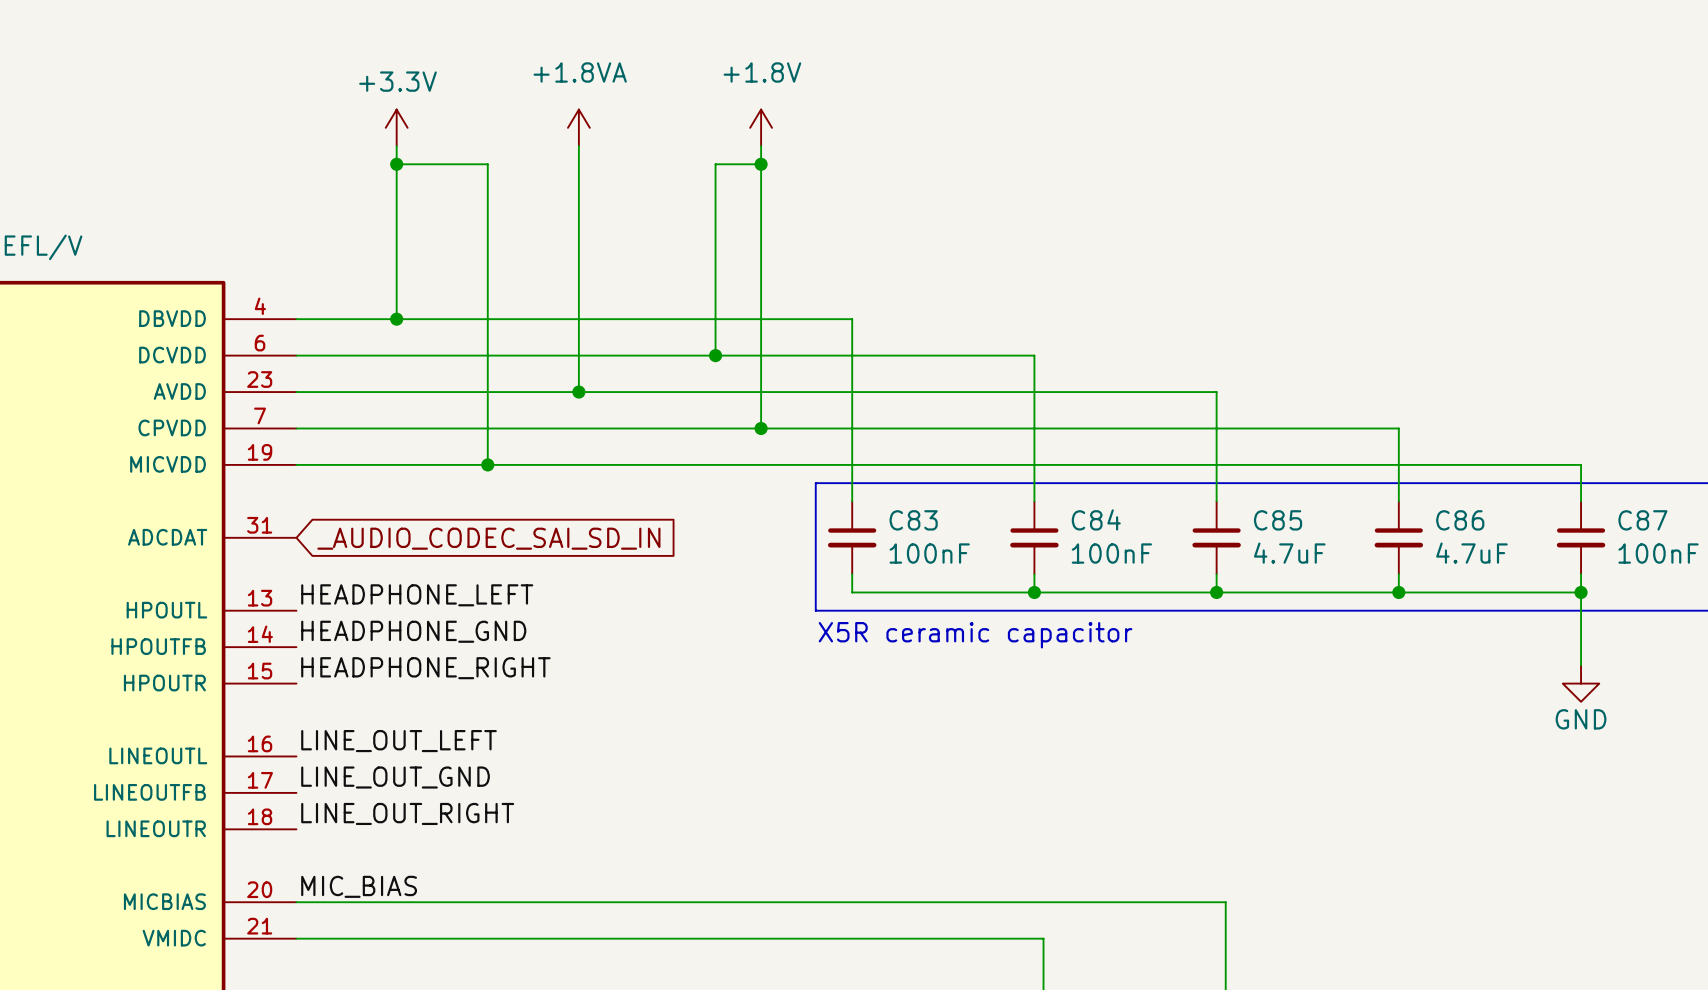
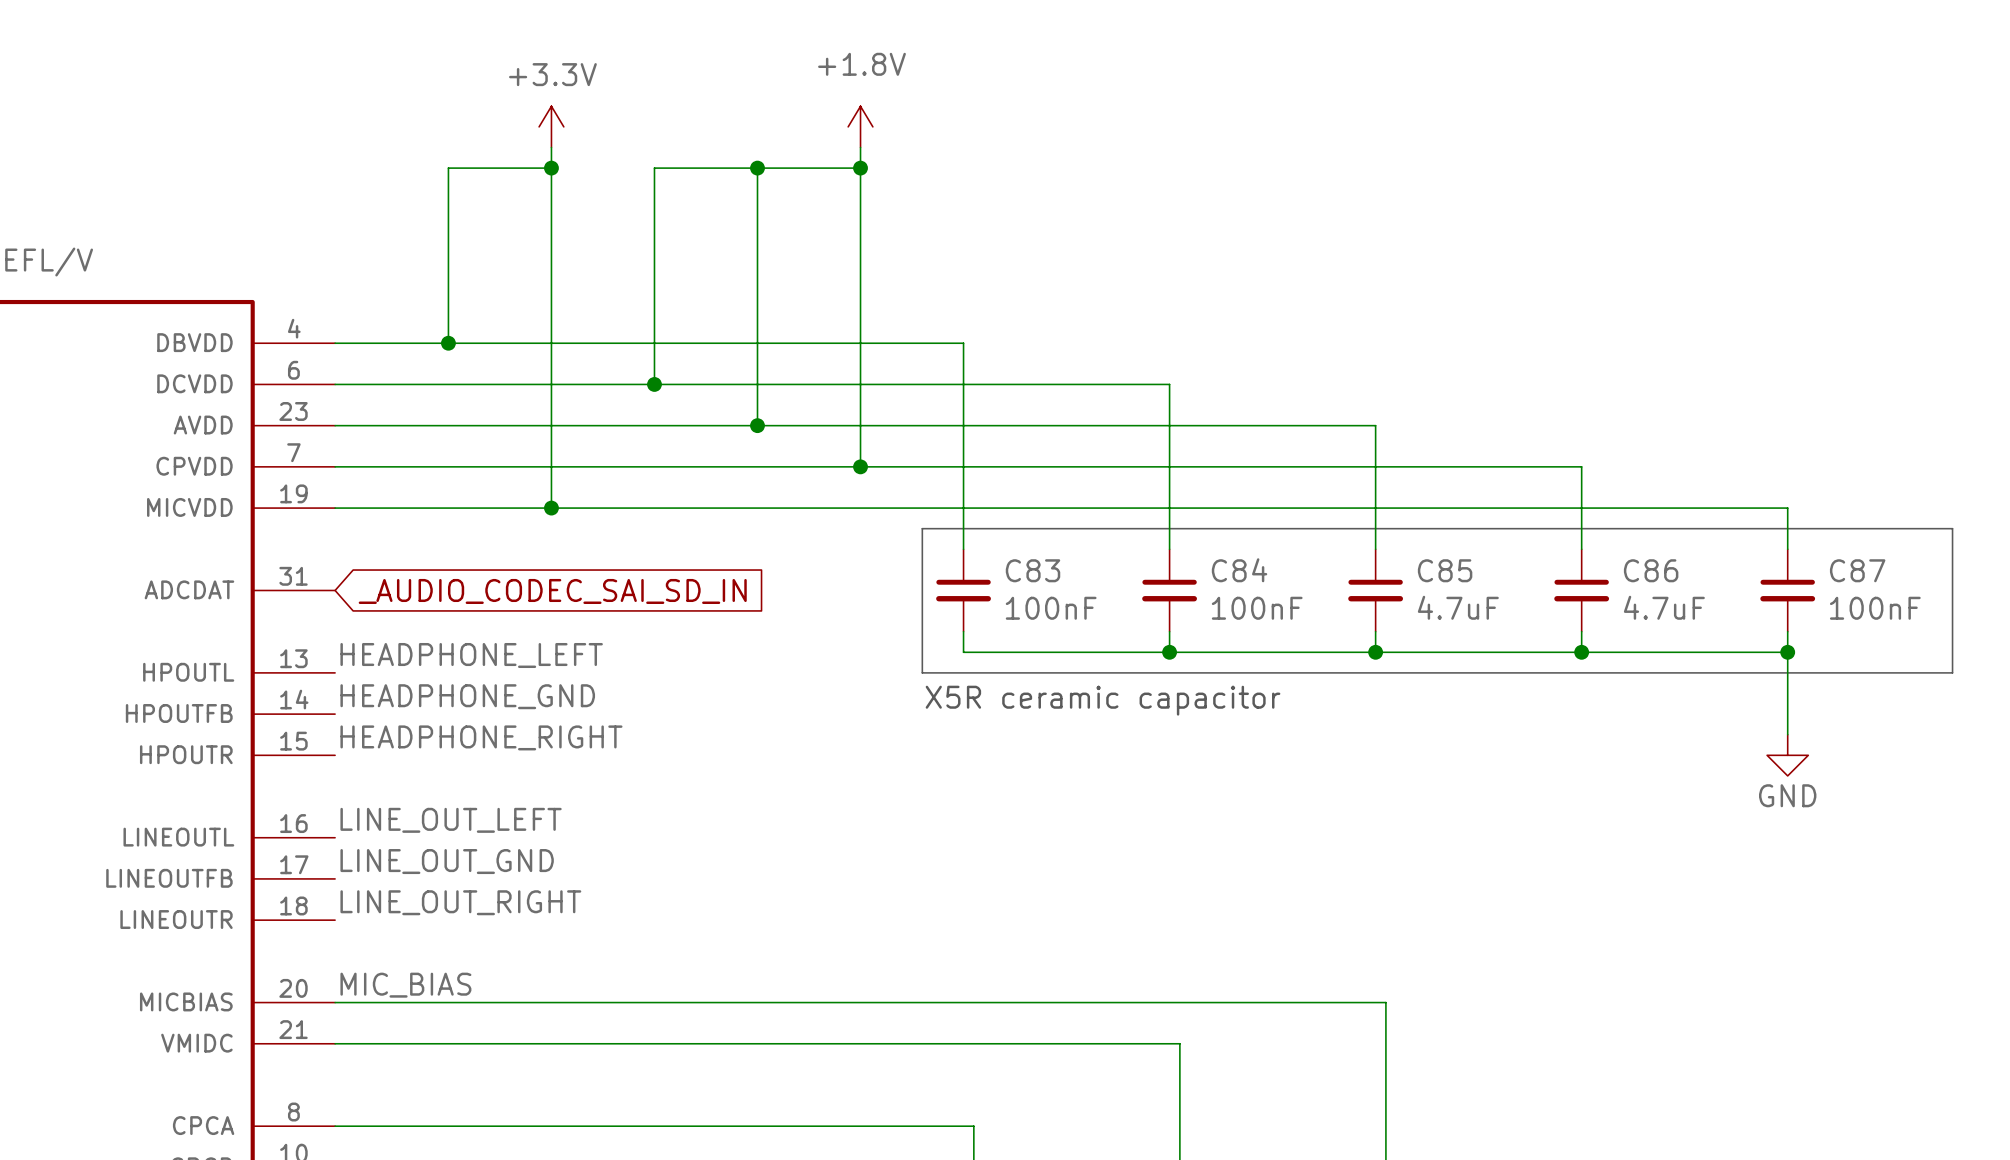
power symbol position: +3.3V (396, 127) -> +3.3V (551, 126)
power symbol: +1.8VA (578, 127) -> none
wire: (396, 146) (396, 164) -> (551, 147) (551, 168)
wire: (578, 146) (578, 164) -> (809, 168) (654, 168)
junction: (396, 164) -> none
junction: none -> (551, 168)
wire: none -> (757, 168) (757, 425)
junction: none -> (757, 168)
wire: (715, 164) (715, 355) -> none
wire: (578, 355) (578, 392) -> none
junction: (715, 355) -> none
junction position: (578, 392) -> (654, 384)
junction: none -> (757, 425)

